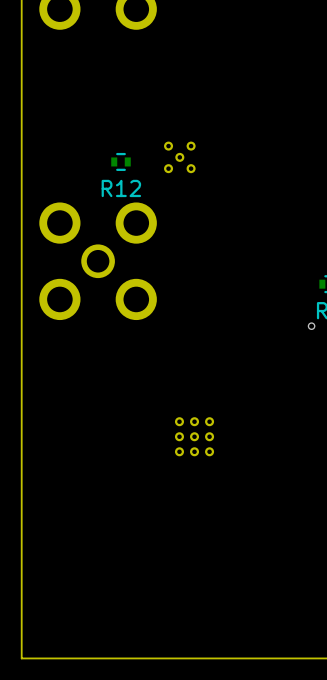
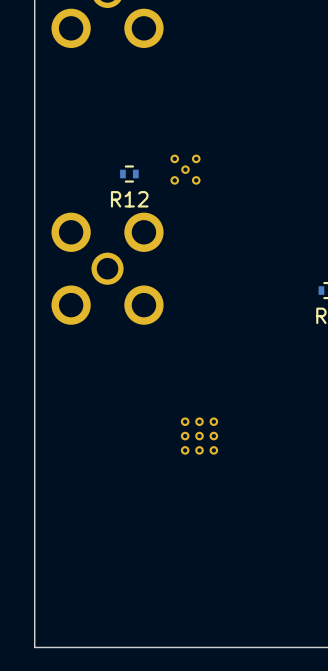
via: (311, 326) -> none

